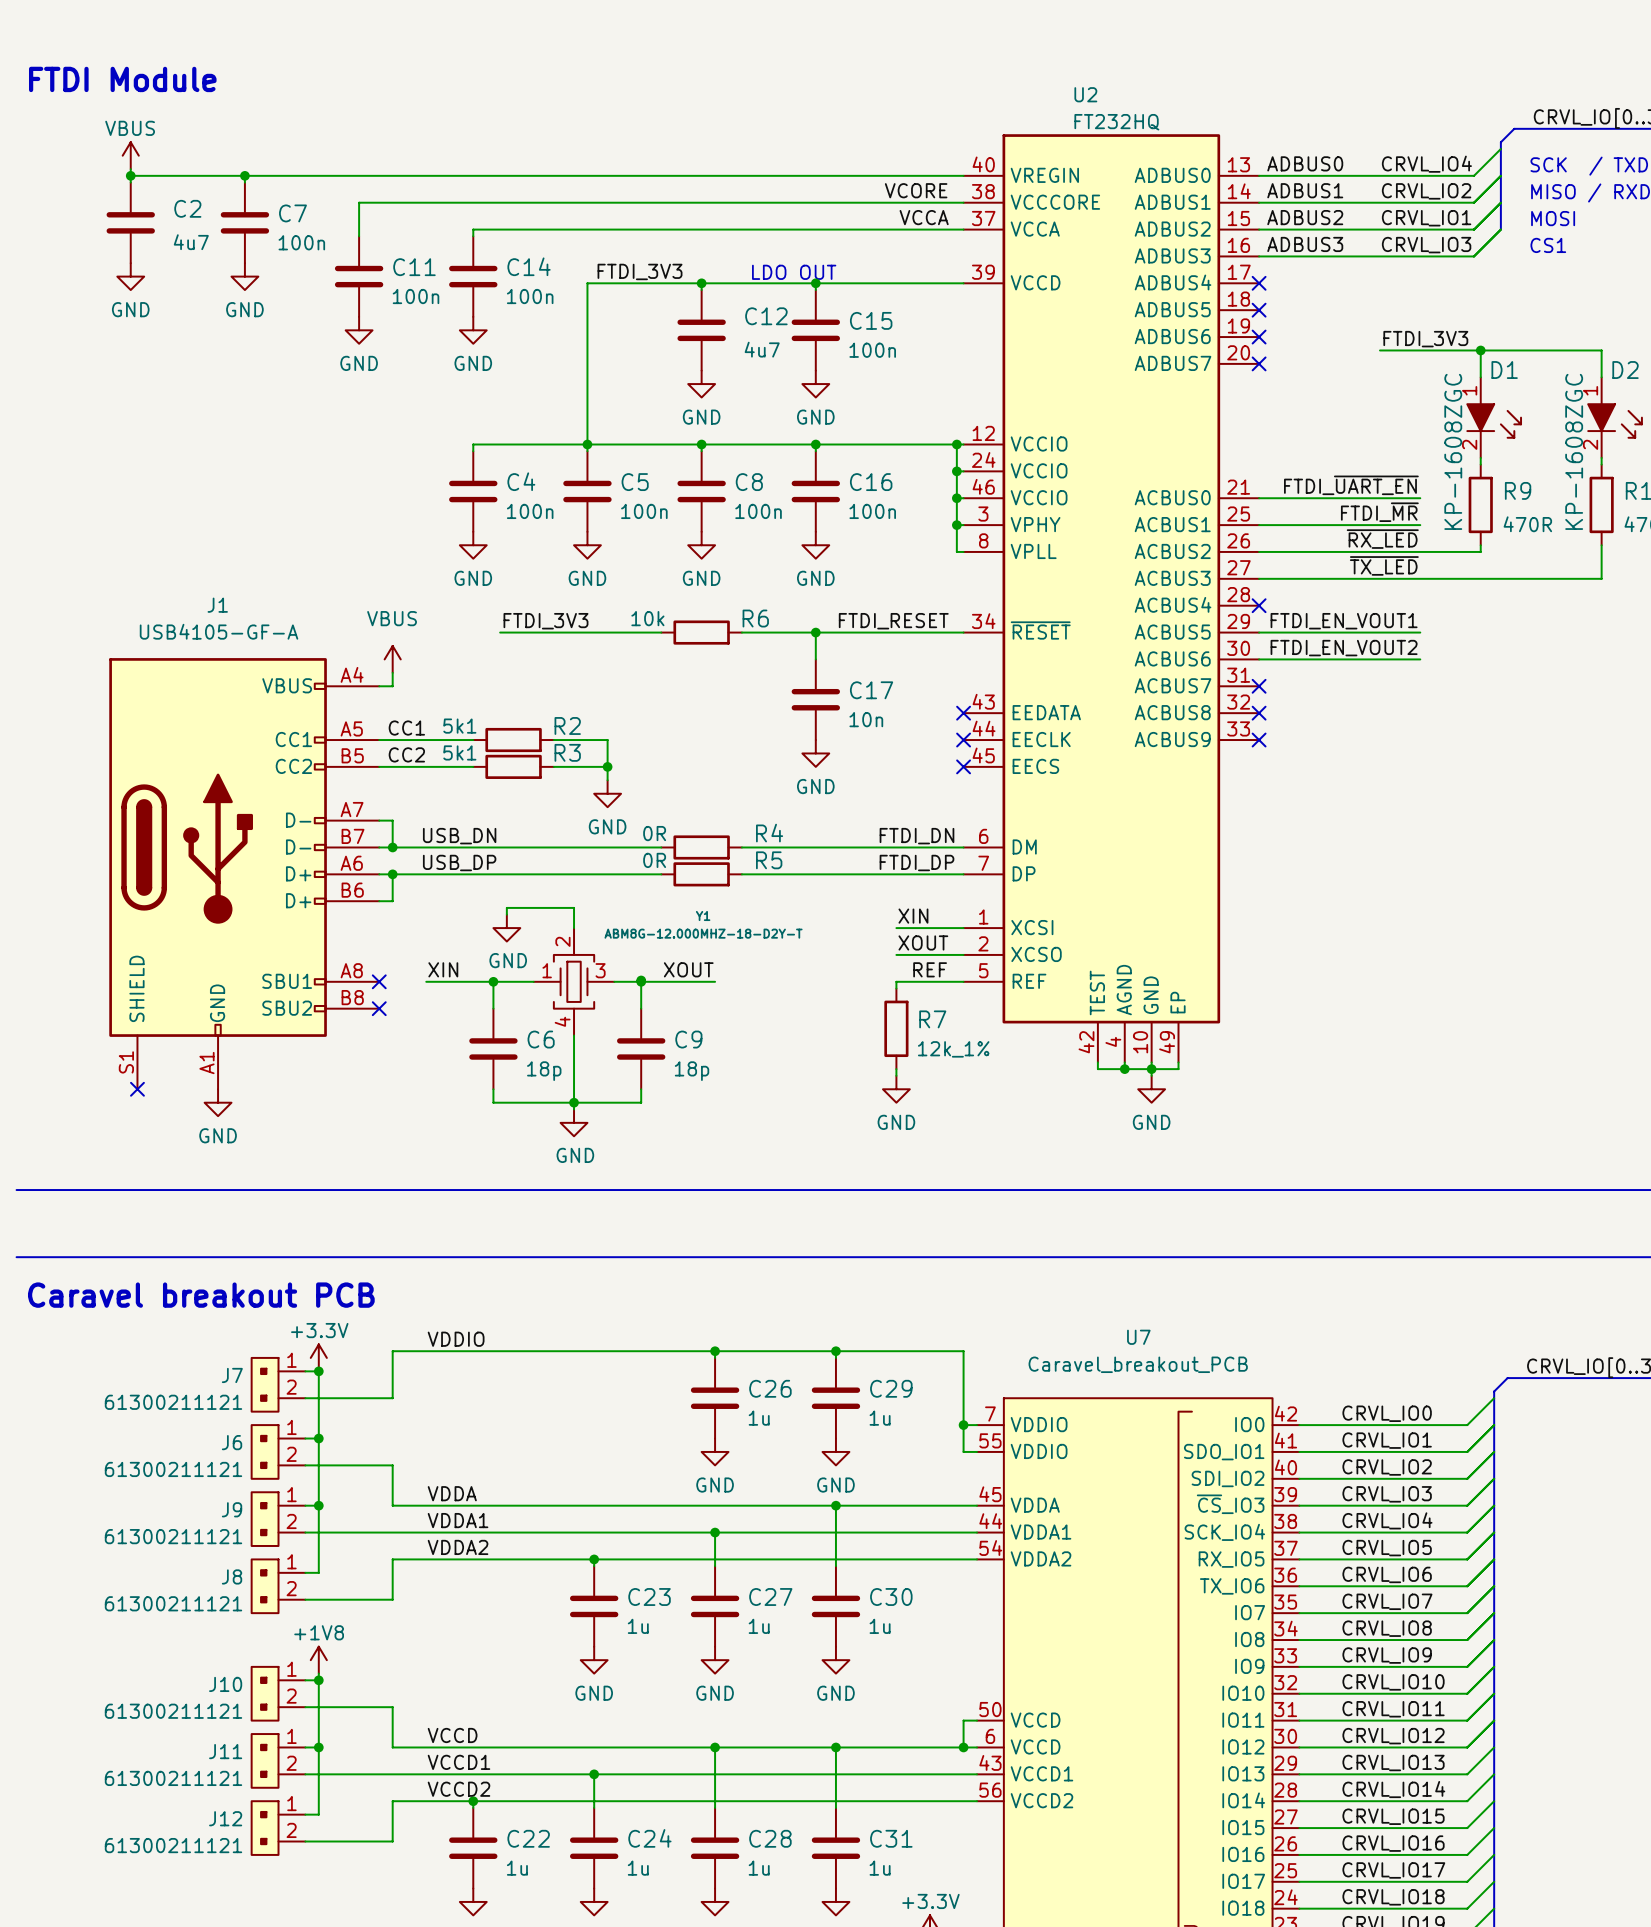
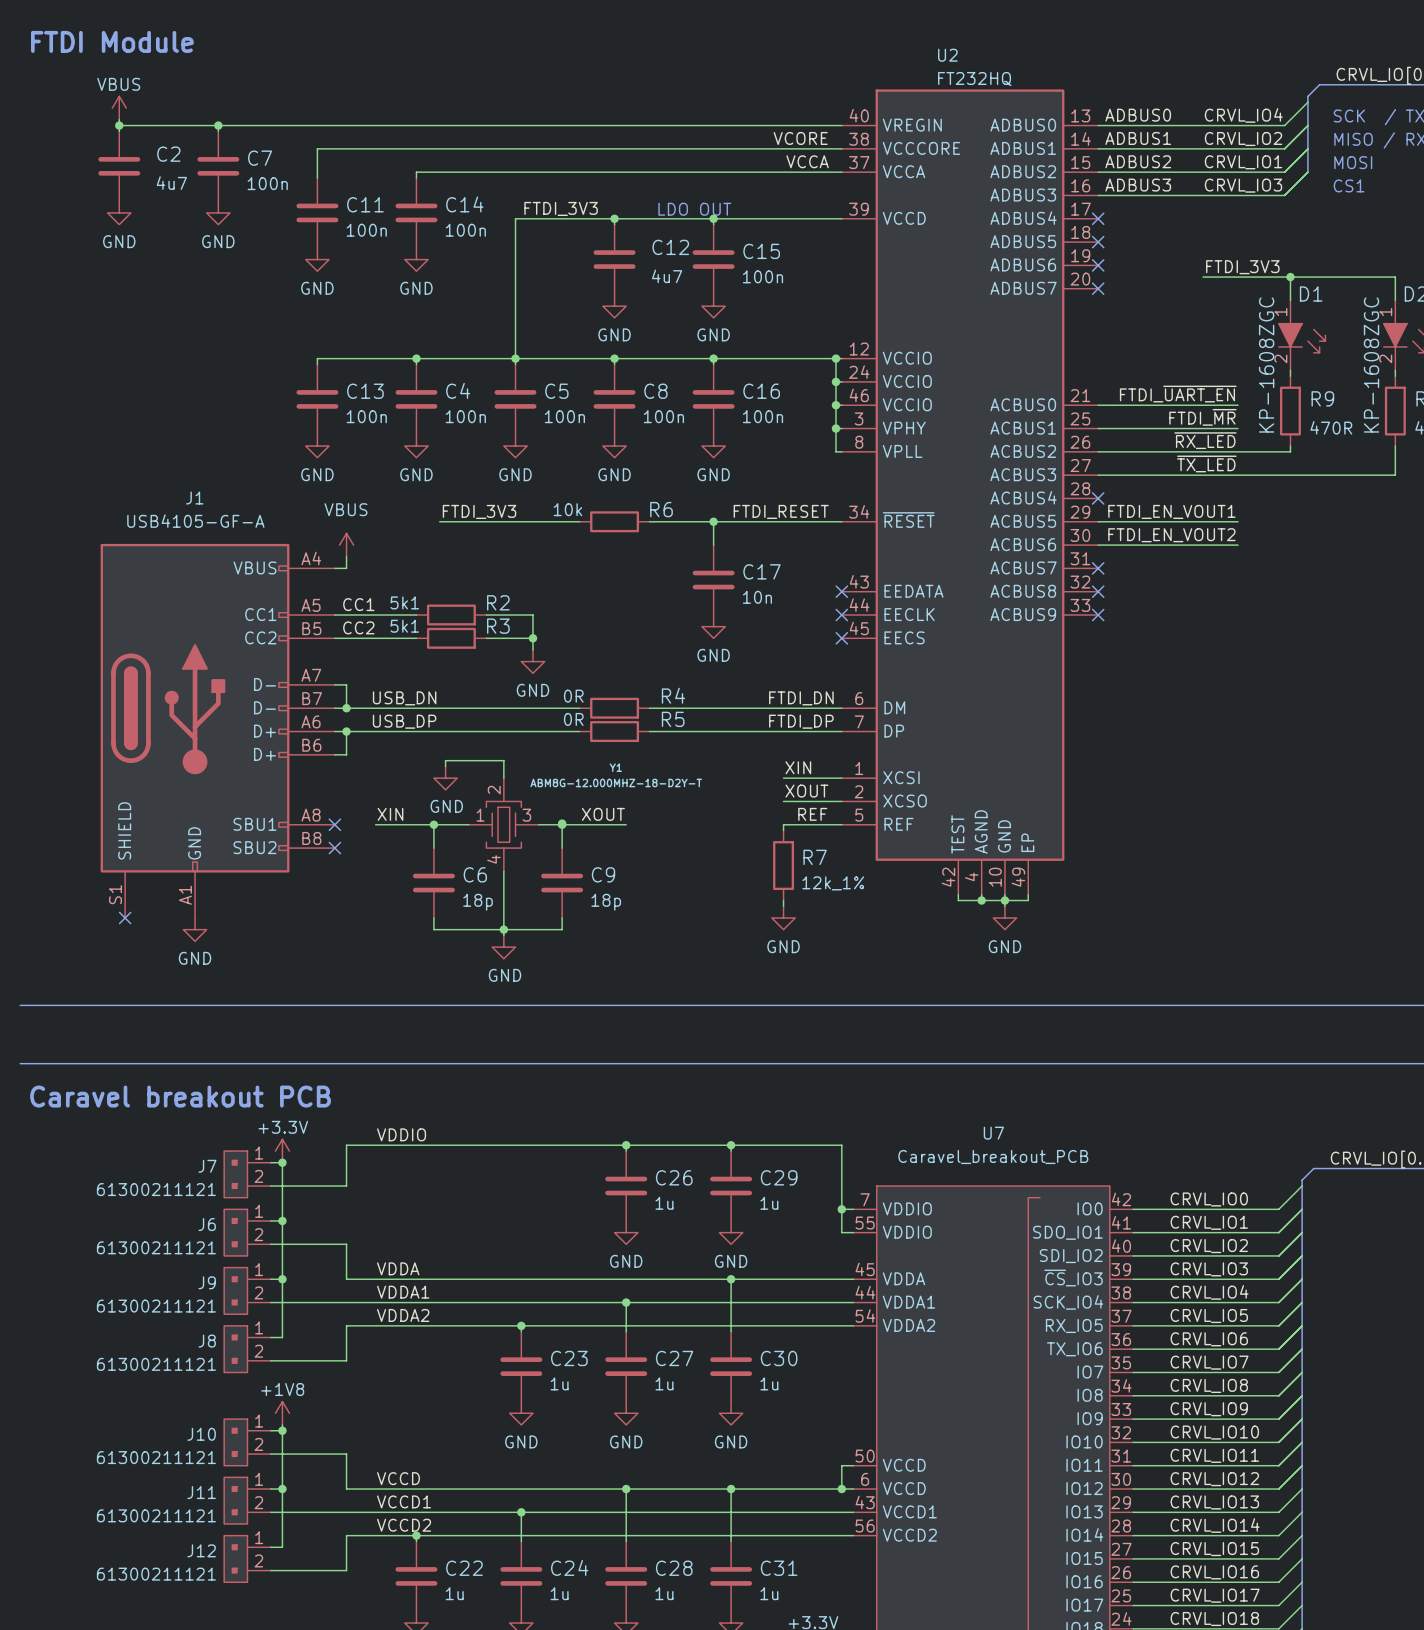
wire: none -> (416, 358) (317, 358) (317, 364)
junction: none -> (416, 358)
C13: none -> (317, 399)
power symbol: none -> GND (317, 446)

